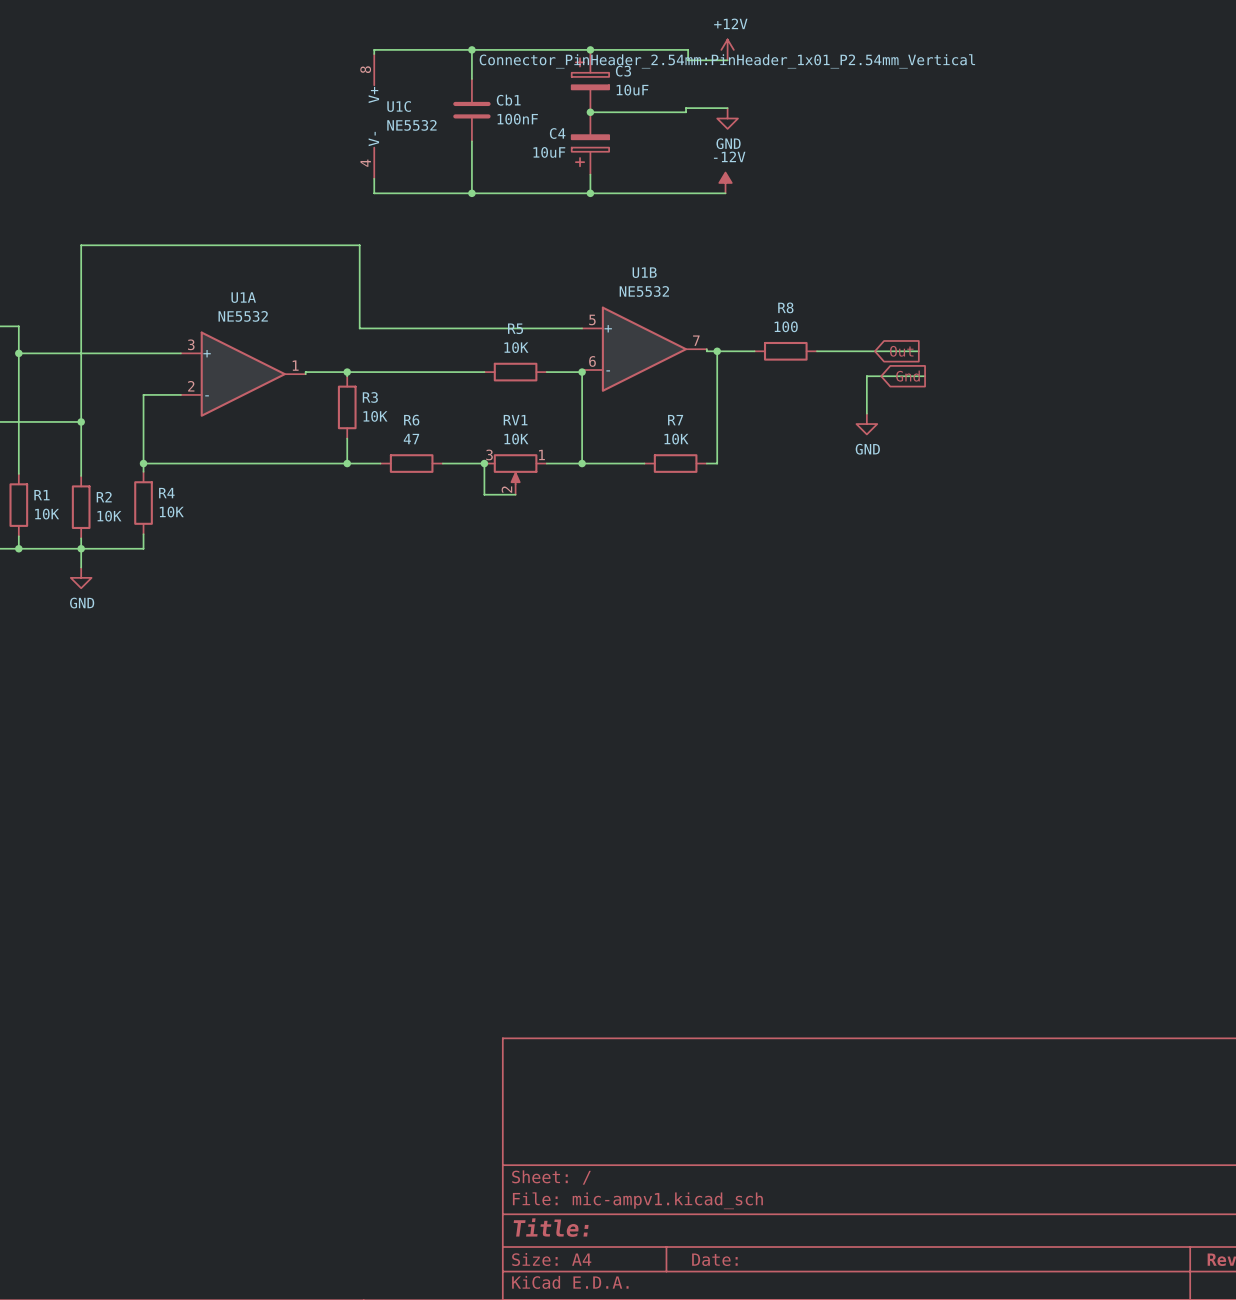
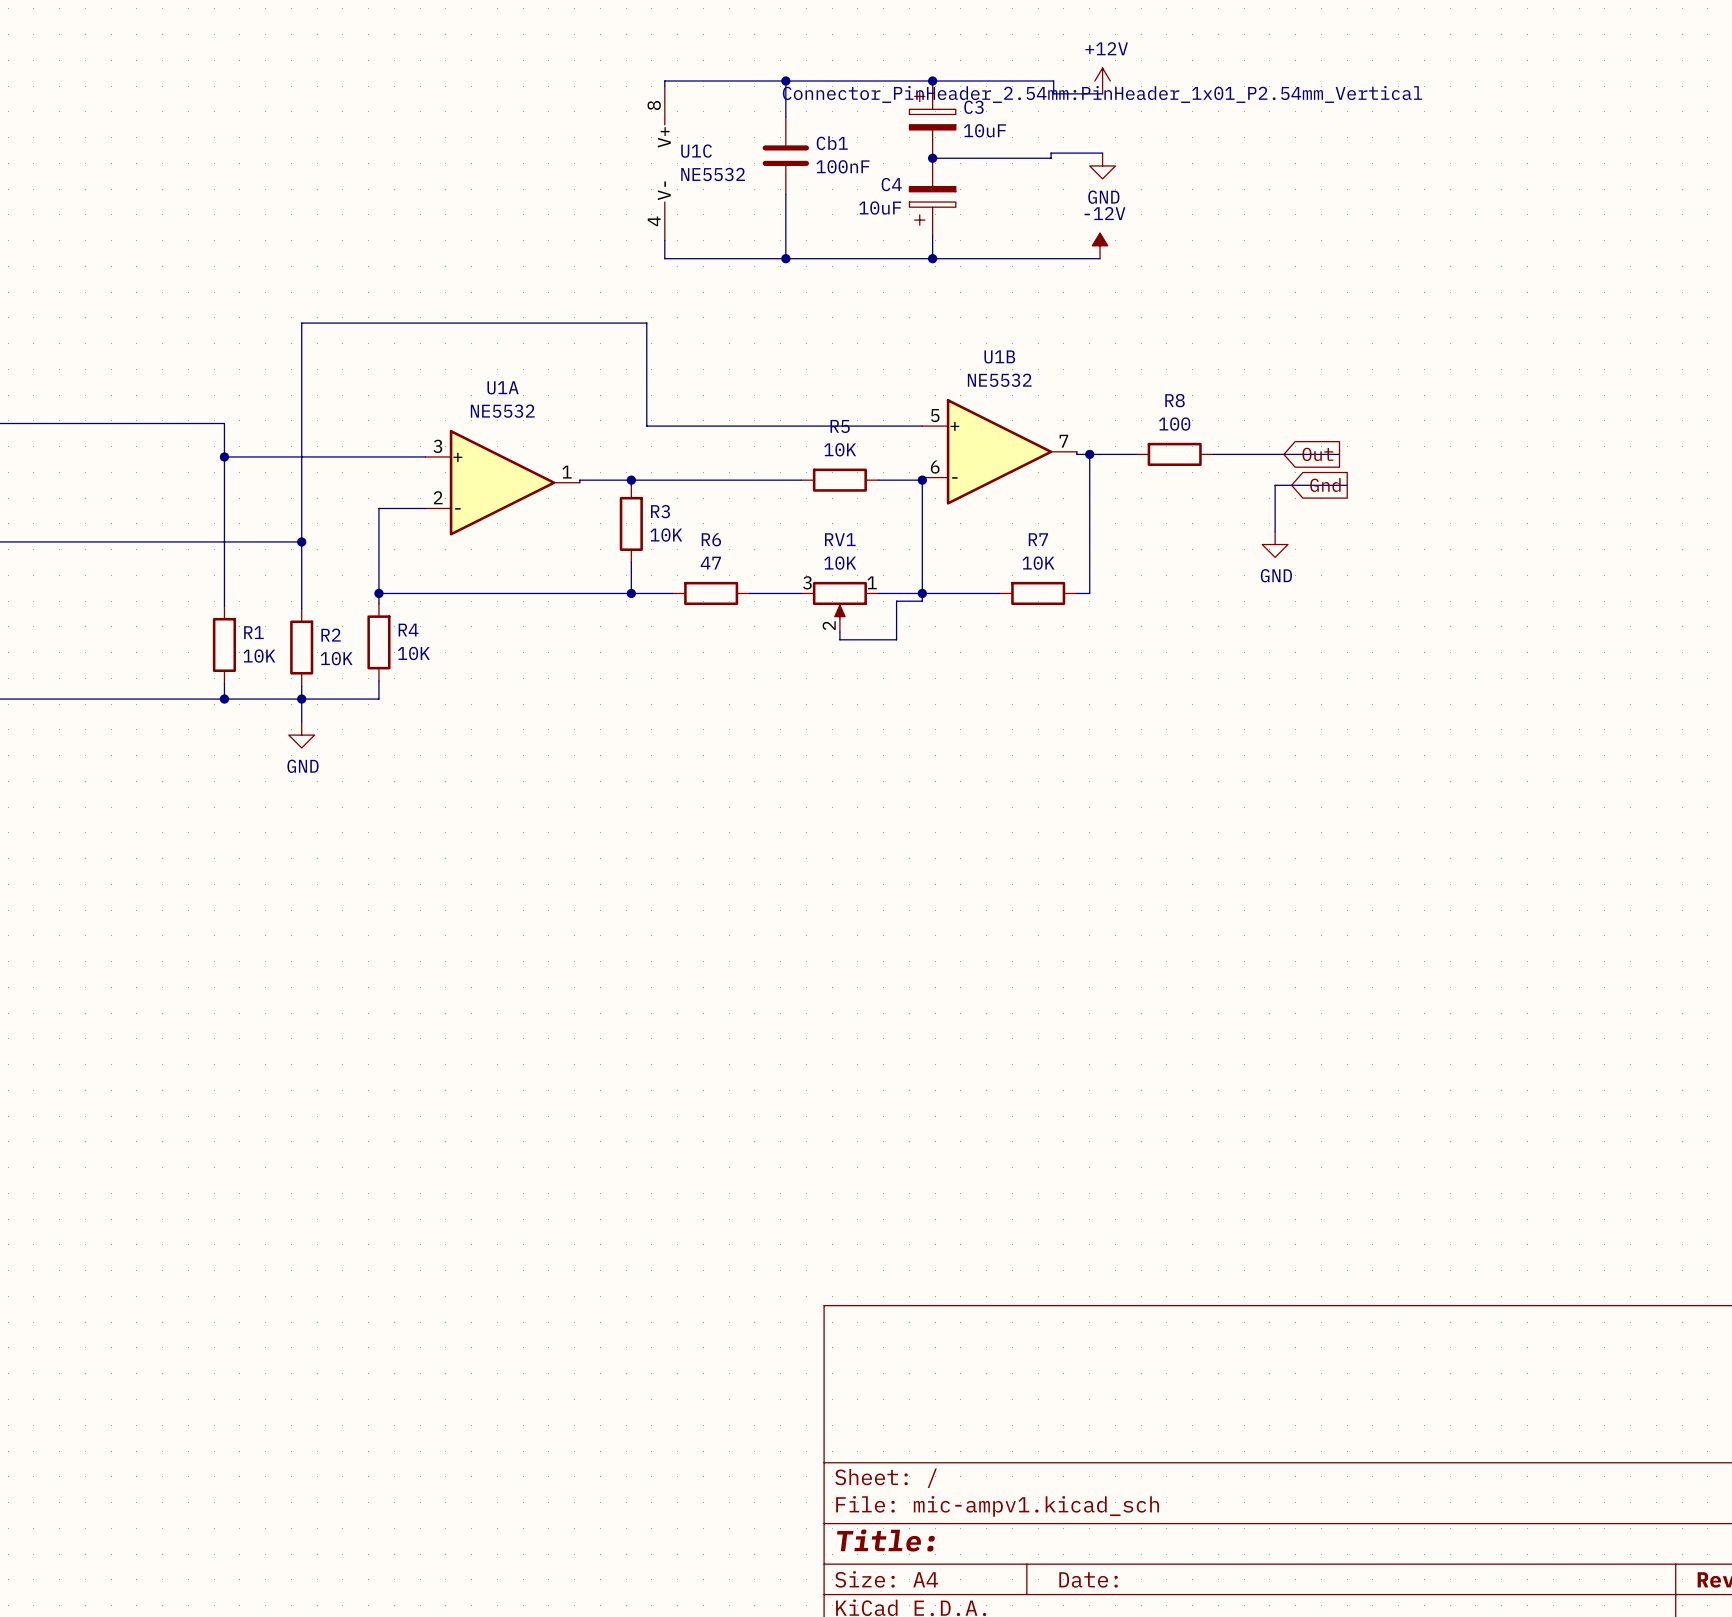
wire: (484, 463) (484, 494) (515, 494) -> (922, 593) (922, 601) (896, 601) (896, 639) (839, 639) (839, 632)
junction: (484, 463) -> none

